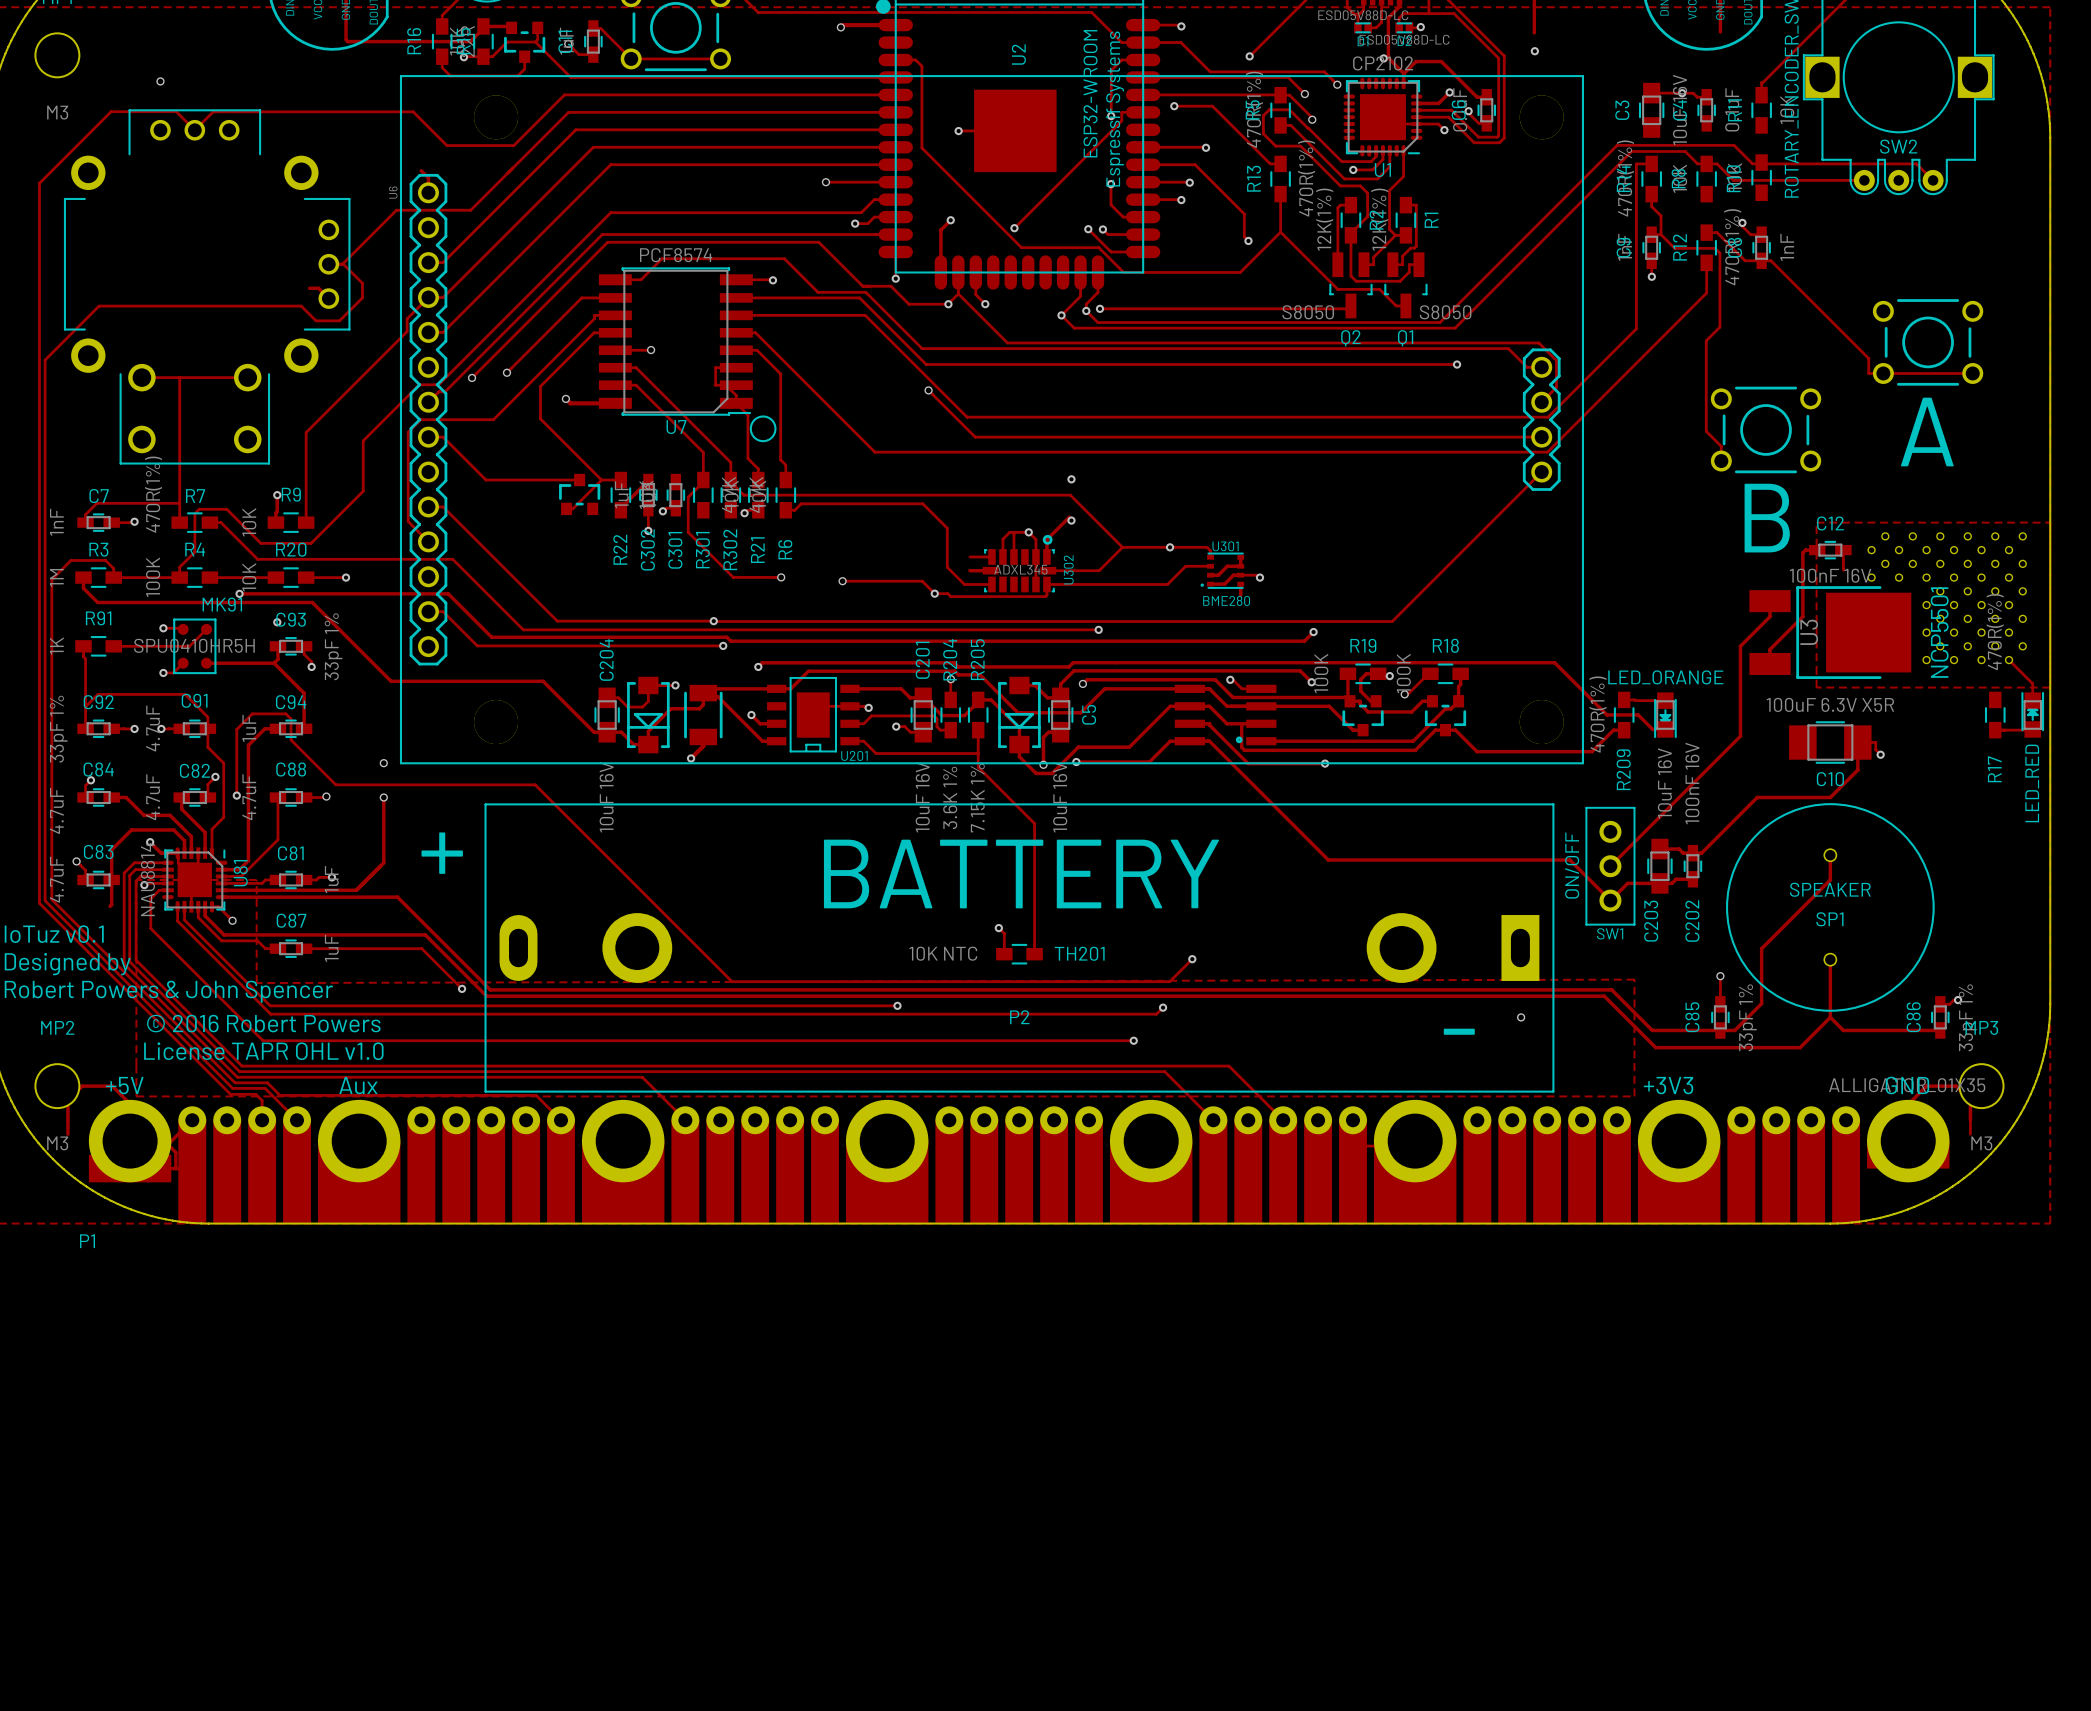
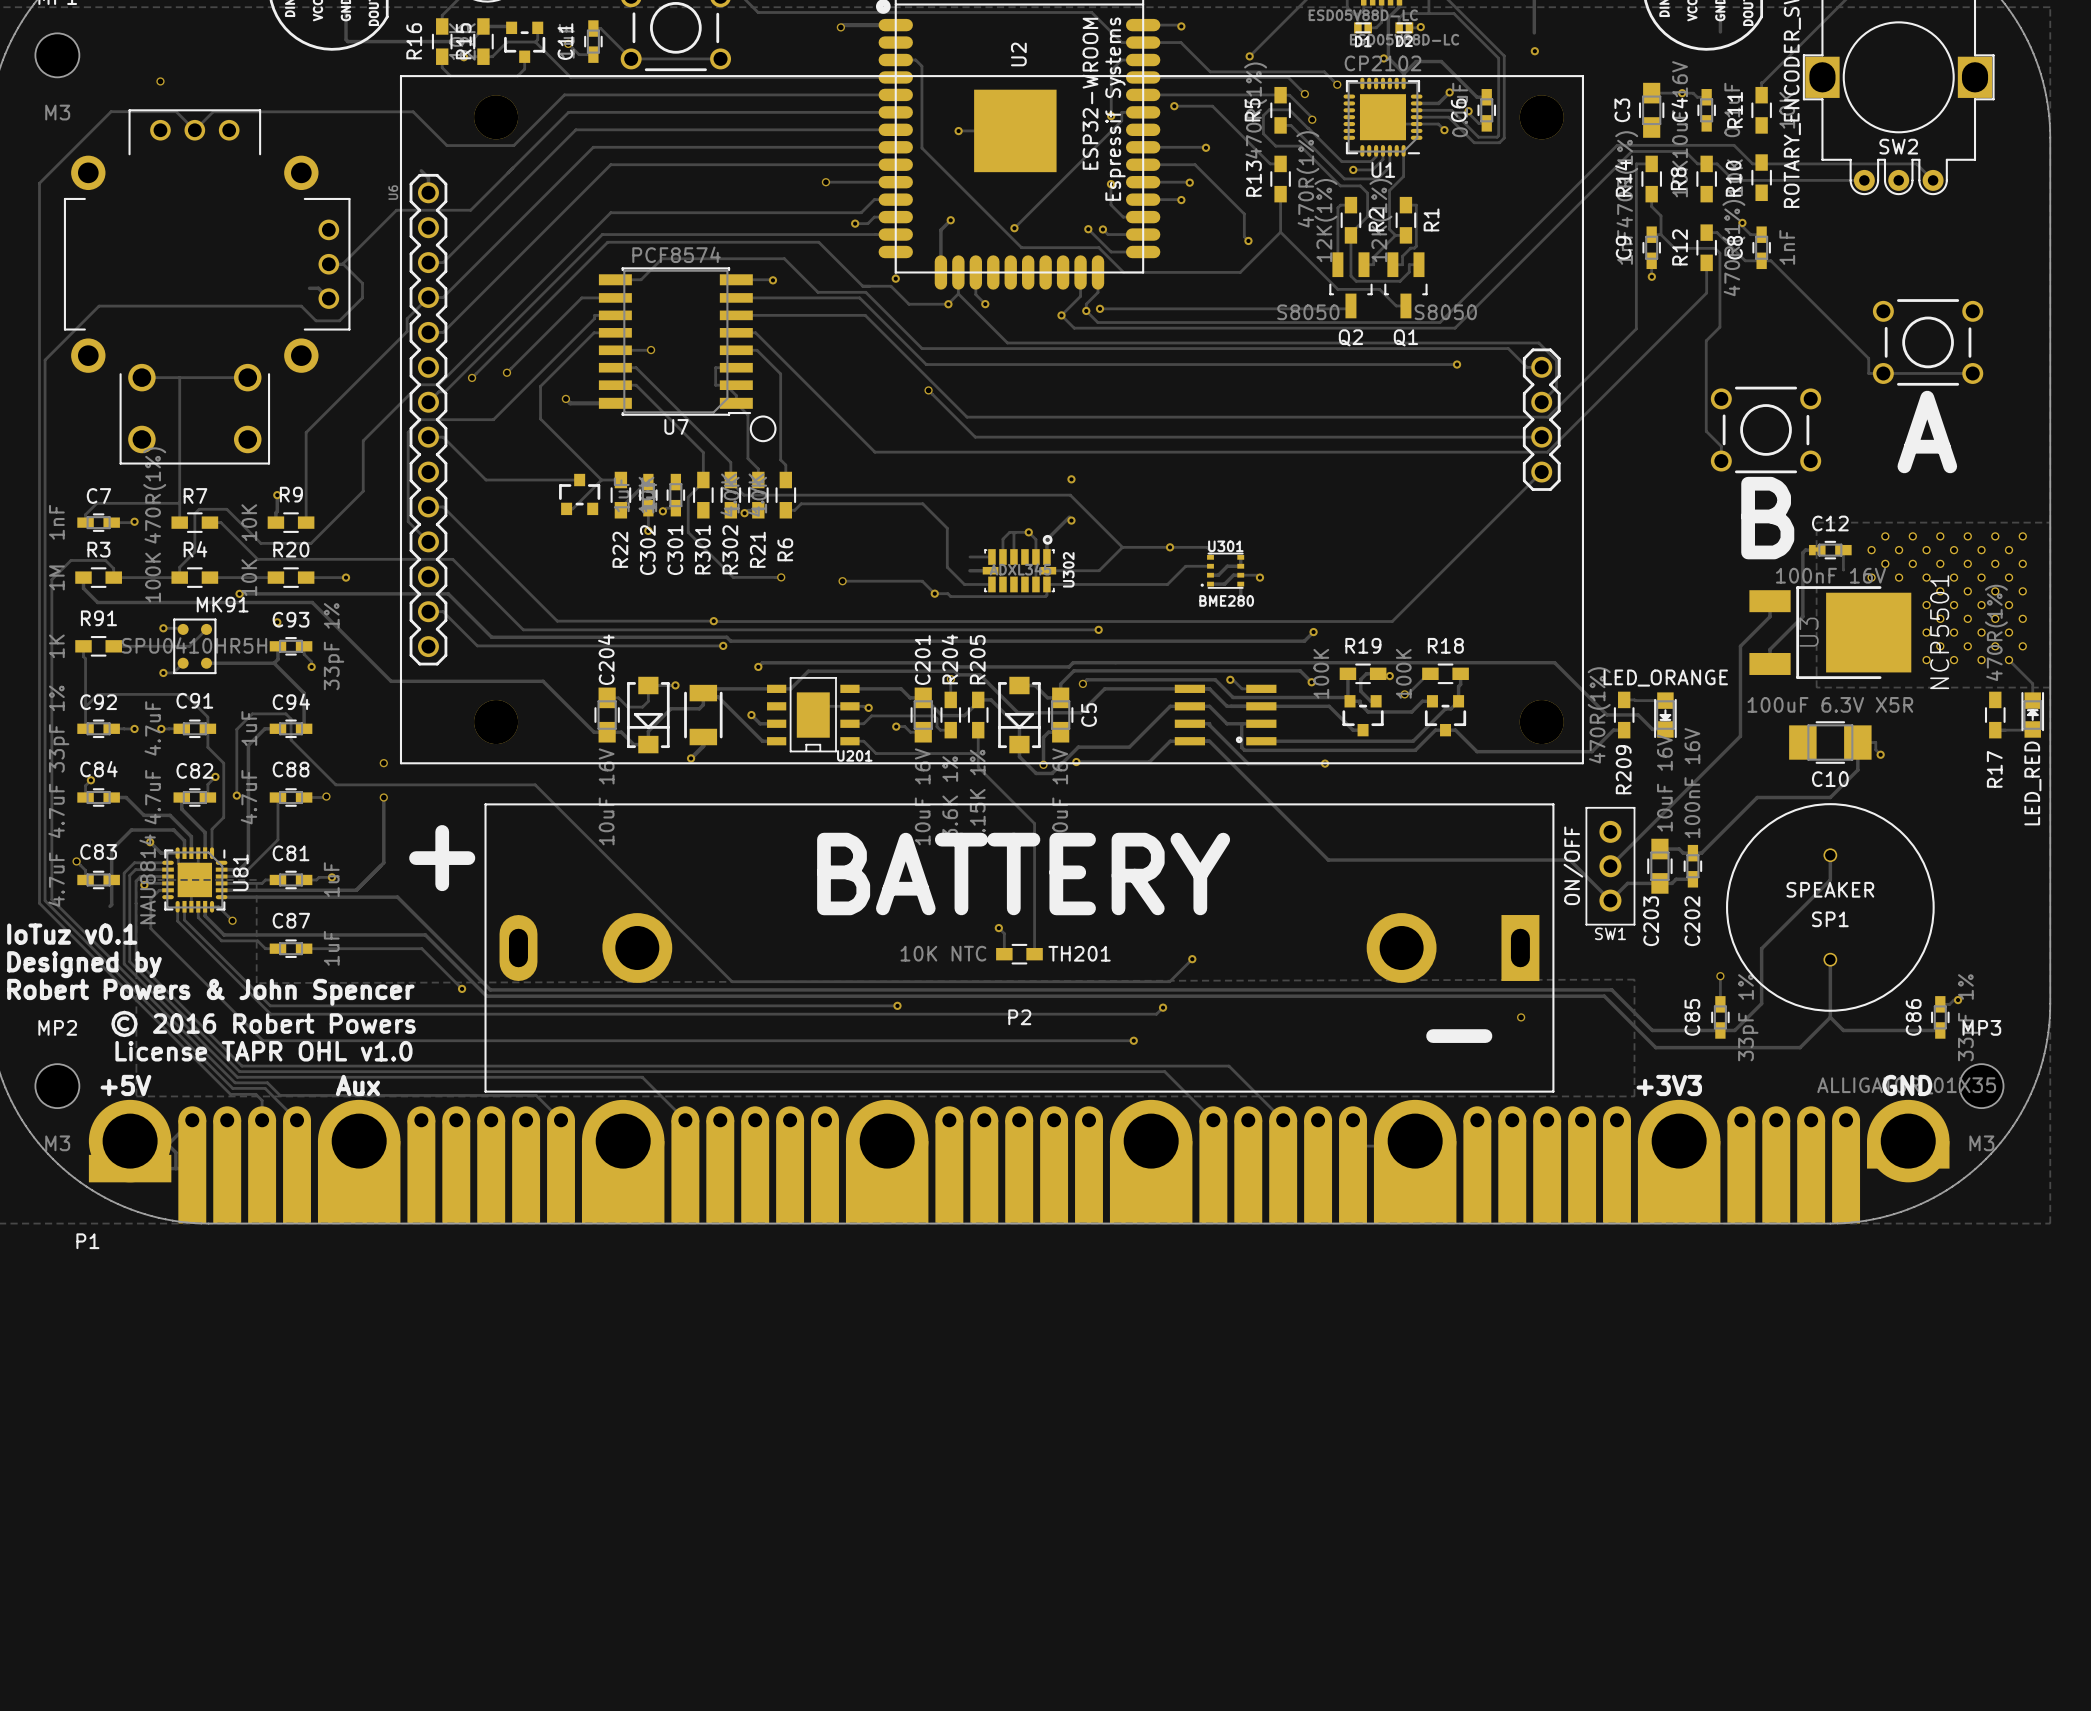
track: (130, 1103) (112, 1086) (82, 1086) (67, 1100) (67, 1134) -> none
track: (1908, 1104) (1926, 1086) (1956, 1086) (1970, 1100) (1970, 1134) -> none

